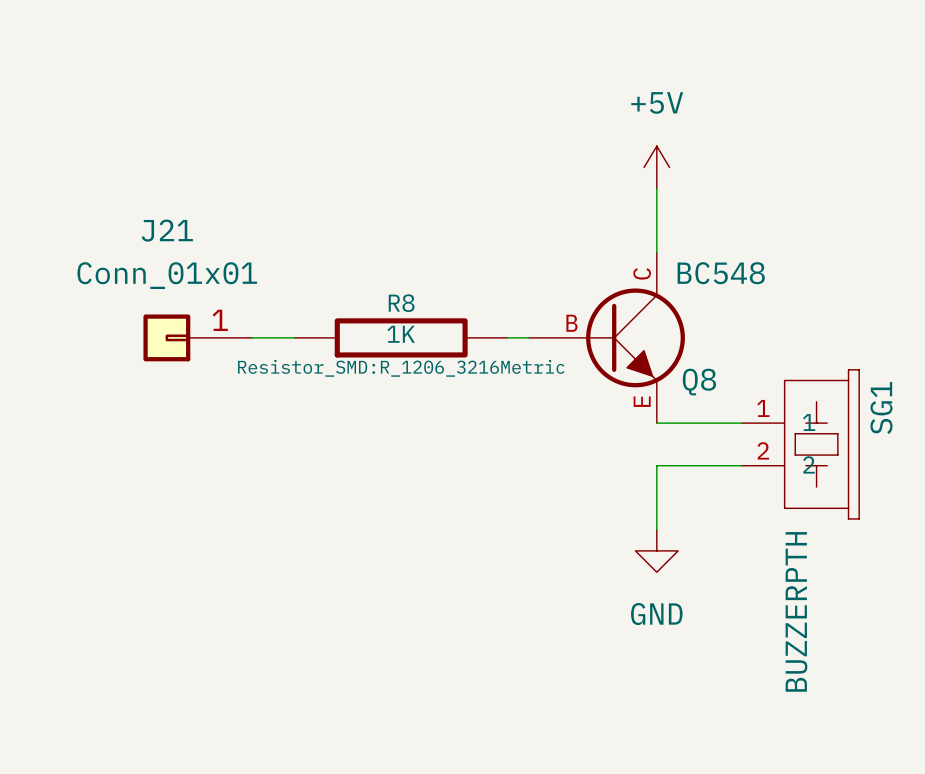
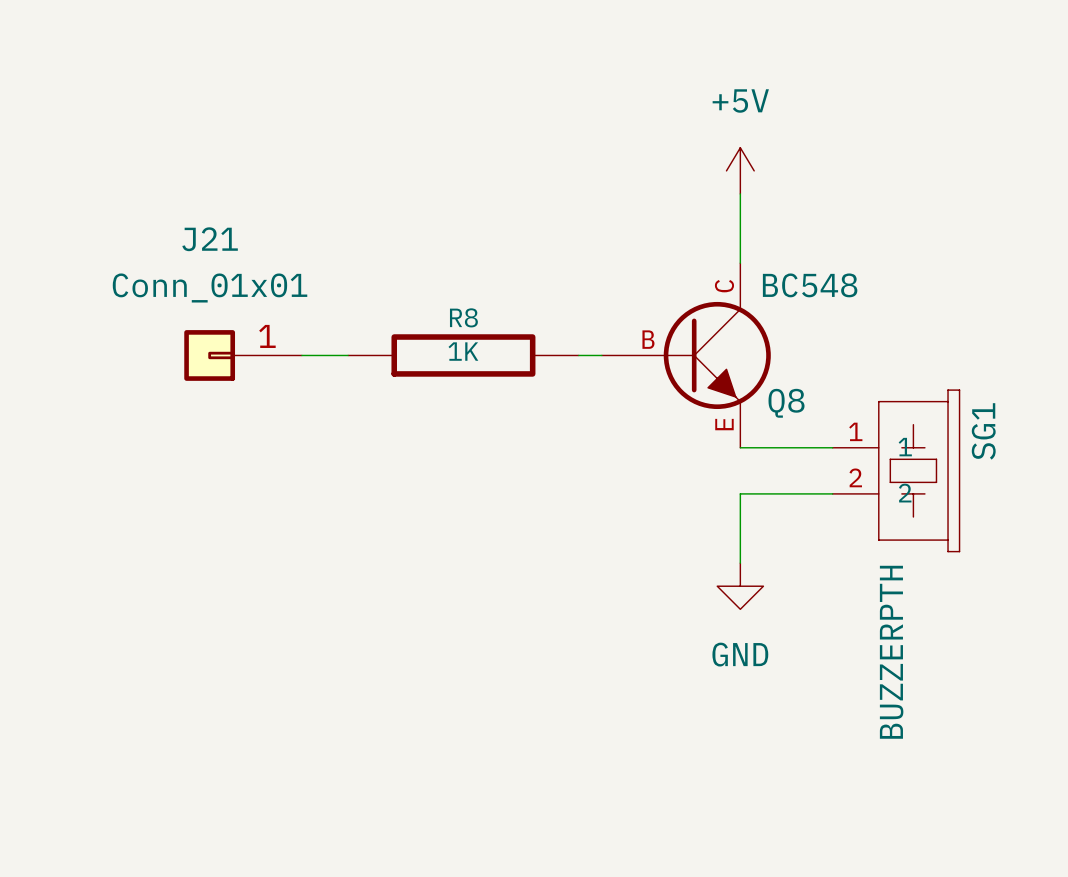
R8 text: Resistor_SMD:R_1206_3216Metric (401, 368) -> none

